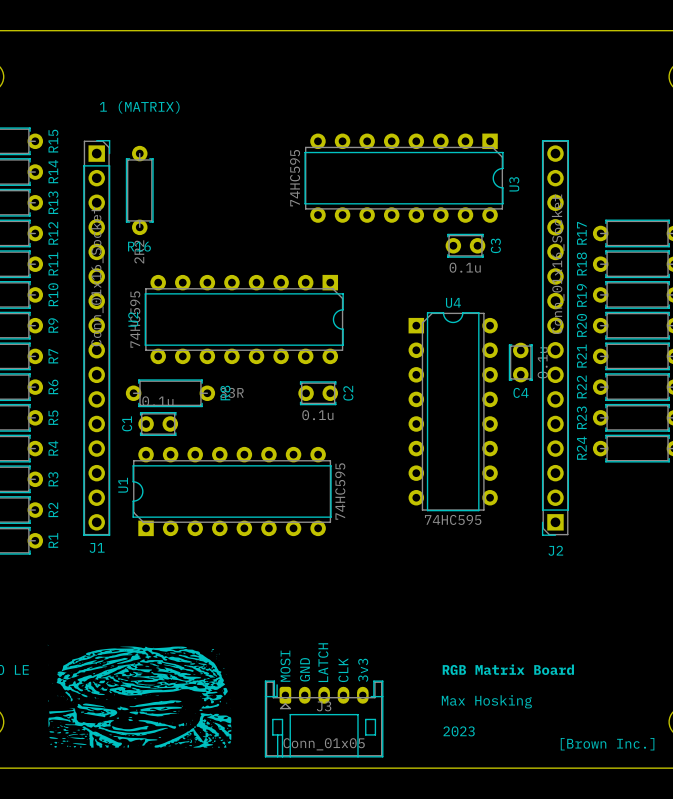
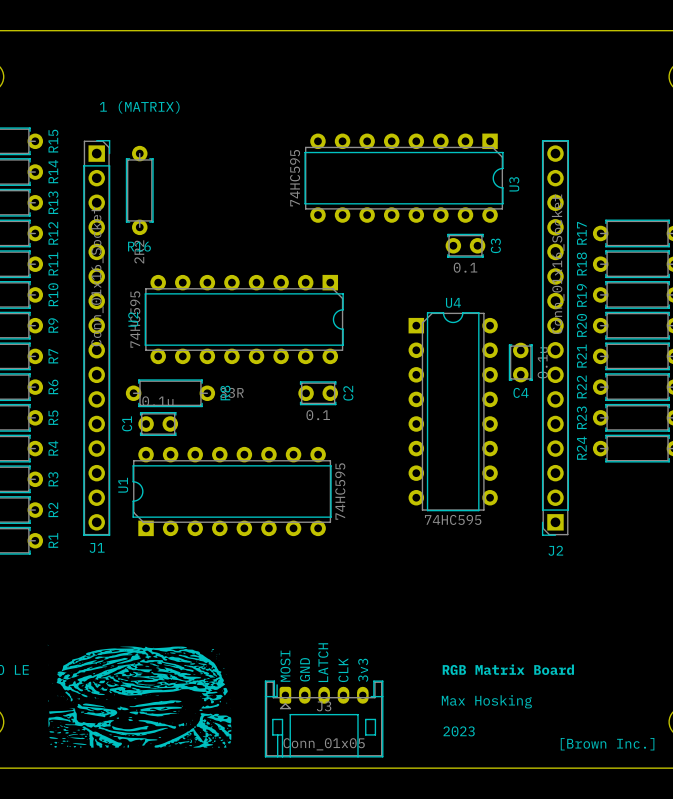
C3 value: 0.1u (465, 267) -> 0.1 (465, 267)
C2 value: 0.1u (317, 415) -> 0.1 (318, 415)

